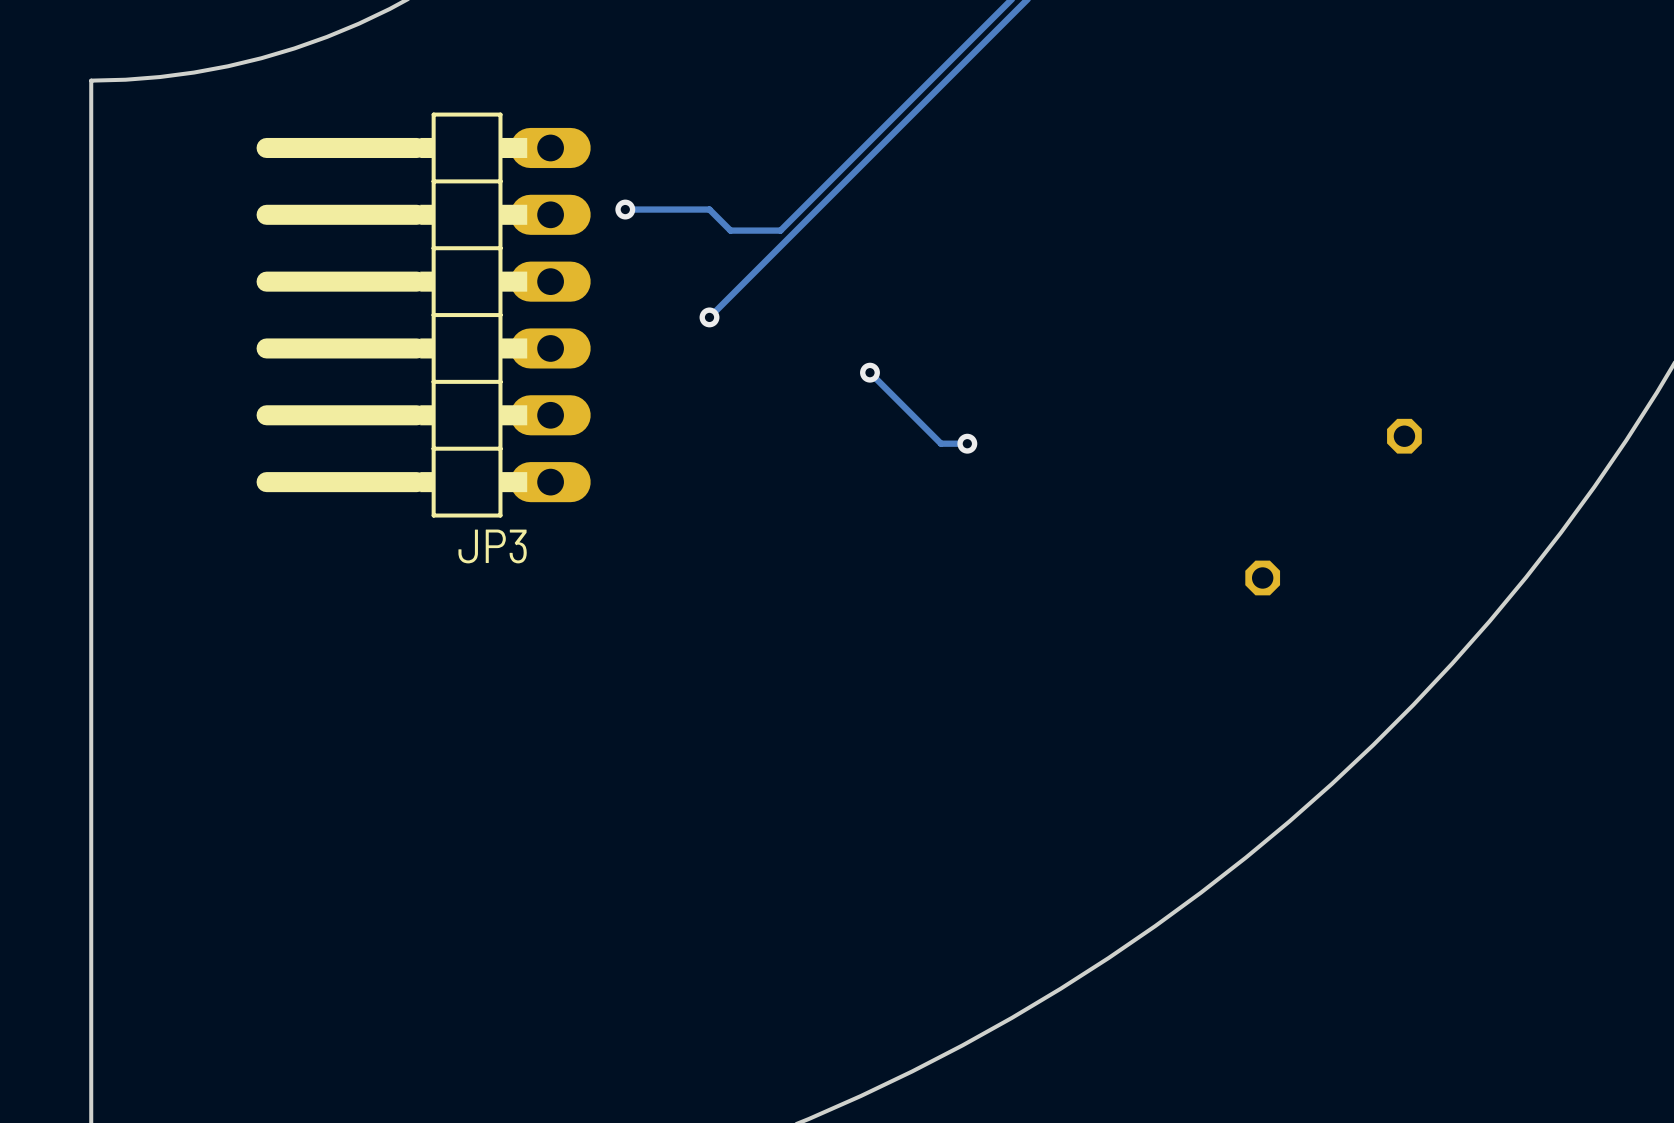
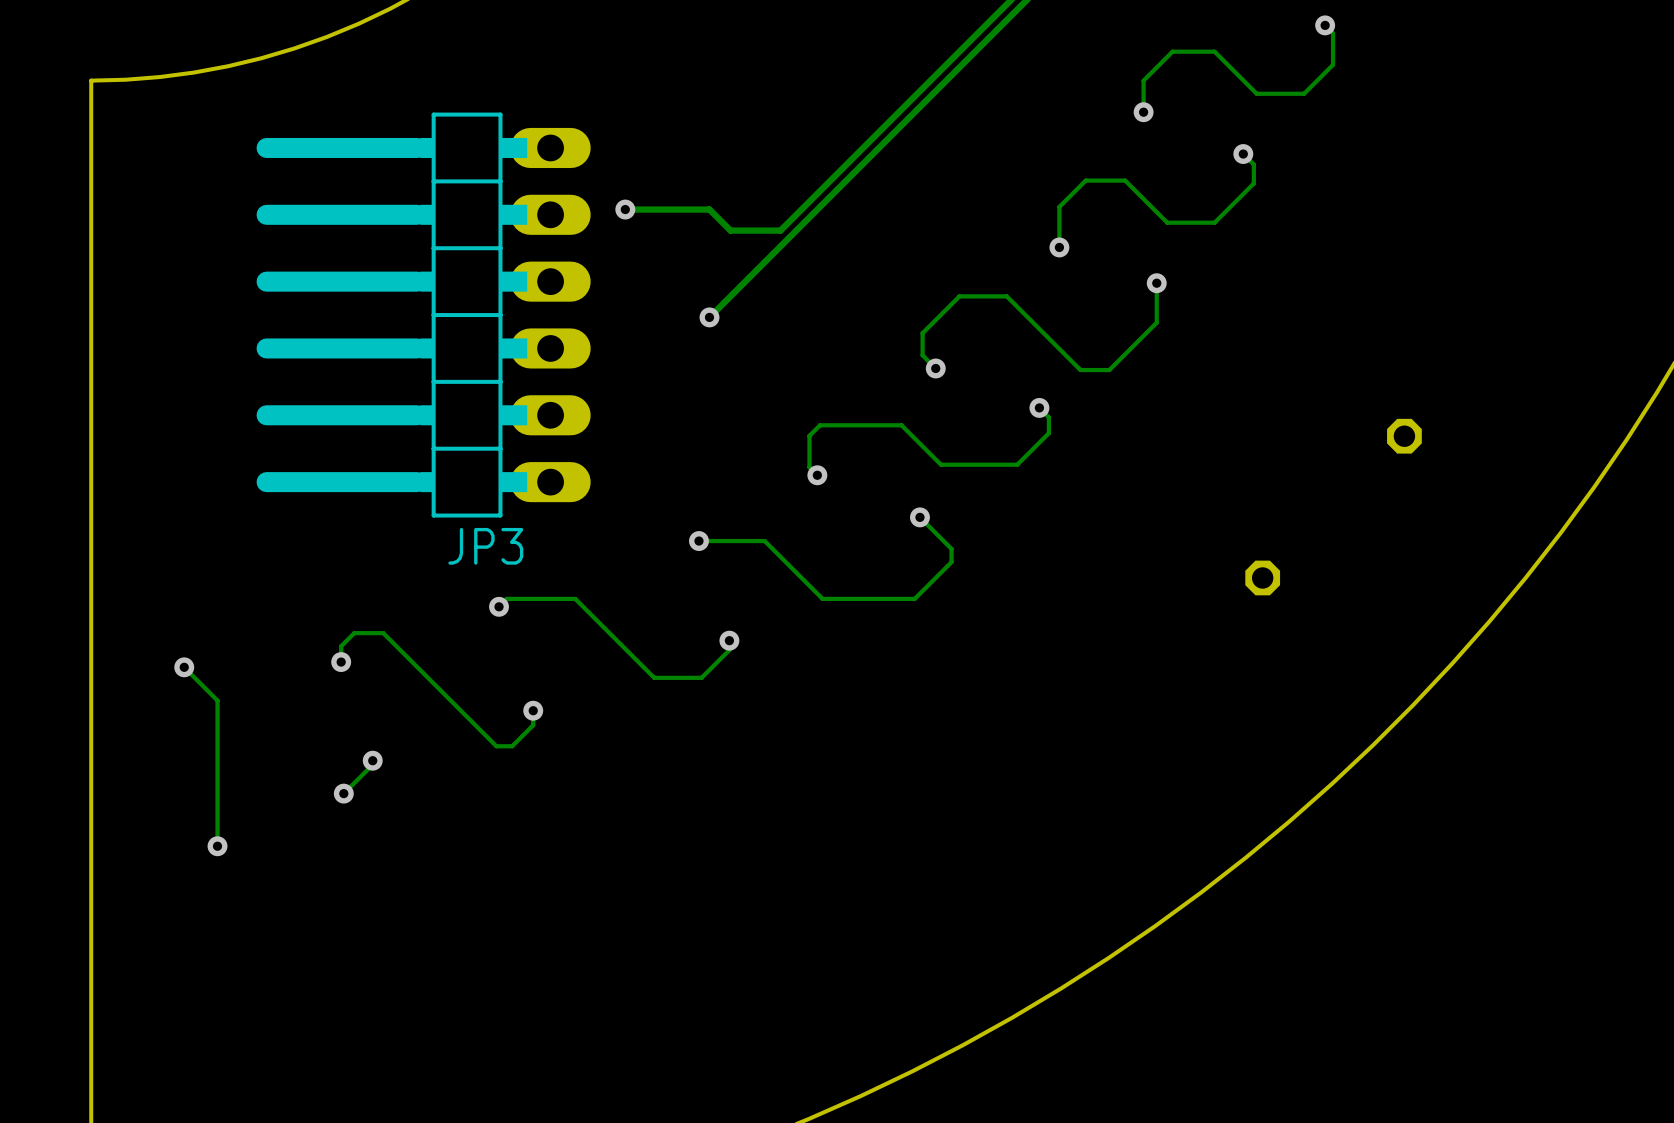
track: none -> (1325, 25) (1333, 33) (1333, 64) (1304, 93) (1256, 93) (1214, 51) (1172, 51) (1143, 80) (1143, 112)
via: none -> (1325, 25)
via: none -> (1143, 112)
track: none -> (1243, 154) (1253, 164) (1253, 183) (1214, 222) (1167, 222) (1125, 180) (1085, 180) (1059, 206) (1059, 247)
via: none -> (1243, 154)
via: none -> (1059, 247)
track: none -> (1156, 283) (1156, 322) (1109, 370) (1080, 370) (1006, 296) (959, 296) (922, 333) (922, 355) (935, 368)
via: none -> (1156, 283)
via: none -> (935, 368)
track: (869, 372) (941, 443) (967, 443) -> none
via: (869, 372) -> none
track: none -> (1039, 407) (1048, 417) (1048, 433) (1017, 464) (941, 464) (901, 425) (820, 425) (809, 435) (809, 467) (817, 475)
via: none -> (1039, 407)
via: (967, 443) -> none
via: none -> (817, 475)
track: none -> (919, 517) (951, 548) (951, 562) (914, 598) (822, 598) (764, 541) (698, 541)
via: none -> (919, 517)
via: none -> (698, 541)
track: none -> (499, 606) (506, 598) (575, 598) (654, 677) (701, 677) (729, 650) (729, 640)
via: none -> (499, 606)
via: none -> (729, 640)
track: none -> (341, 662) (341, 646) (354, 633) (383, 633) (496, 746) (512, 746) (533, 725) (533, 710)
via: none -> (341, 662)
track: none -> (184, 667) (217, 700) (217, 846)
via: none -> (184, 667)
via: none -> (533, 710)
track: none -> (372, 760) (372, 764) (343, 793)
via: none -> (372, 760)
via: none -> (343, 793)
via: none -> (217, 846)

